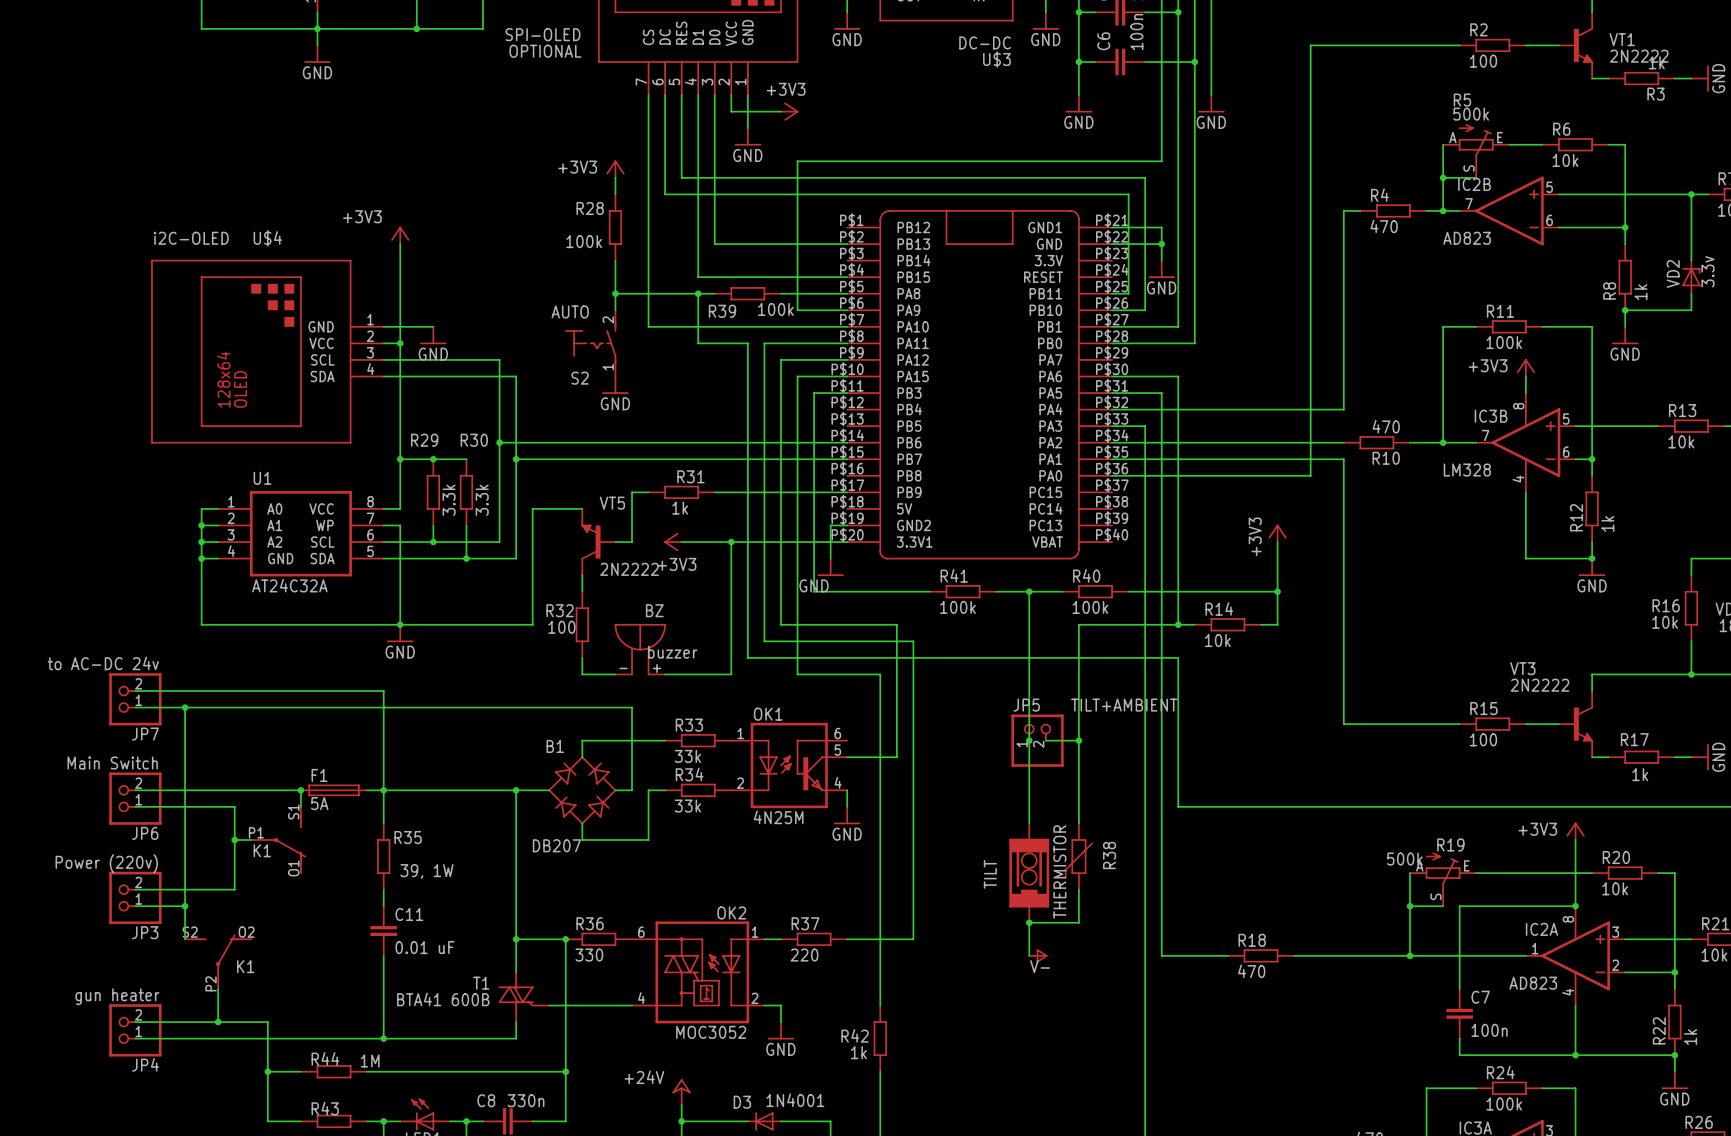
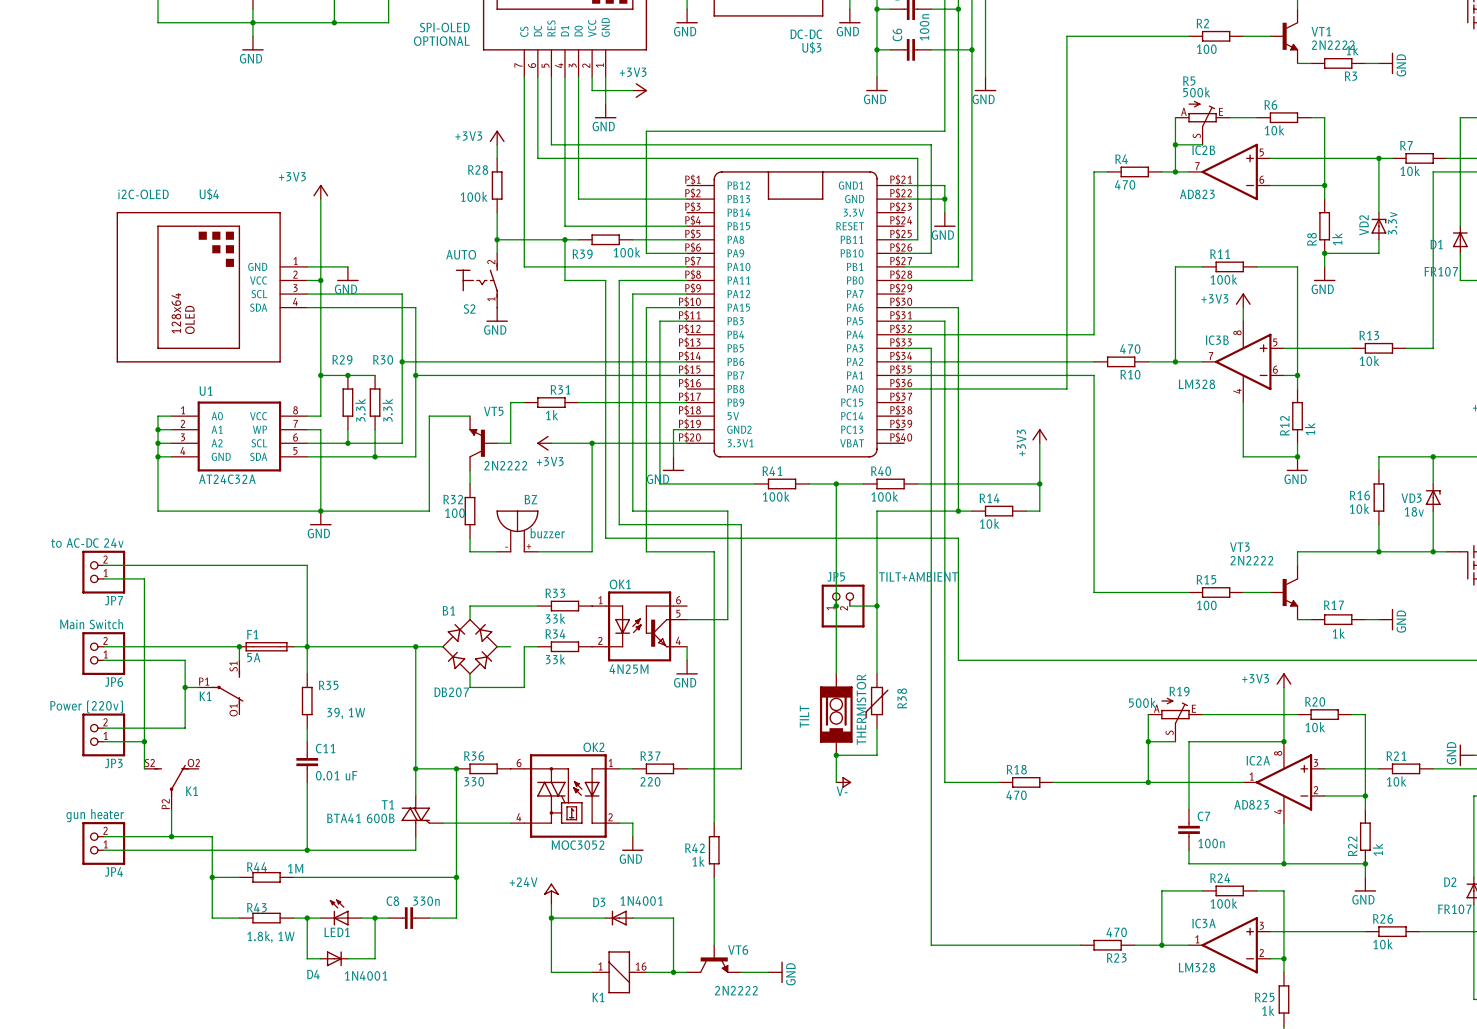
wire: (185, 707) (632, 707) (632, 790) -> none
junction: (185, 707) -> none

